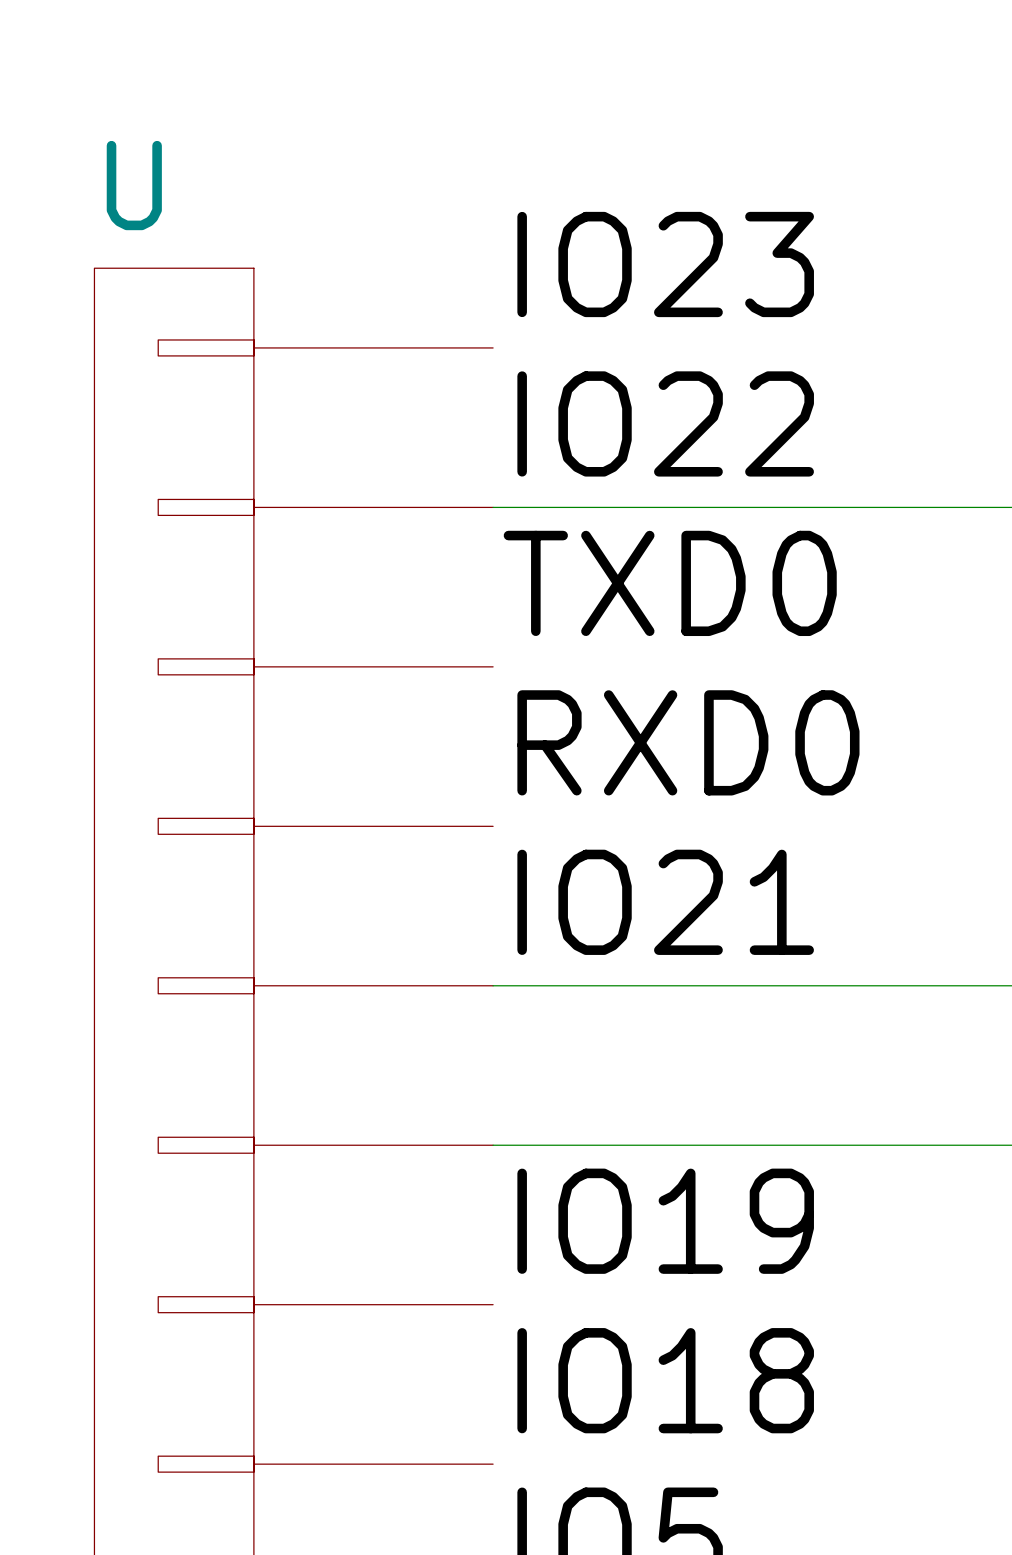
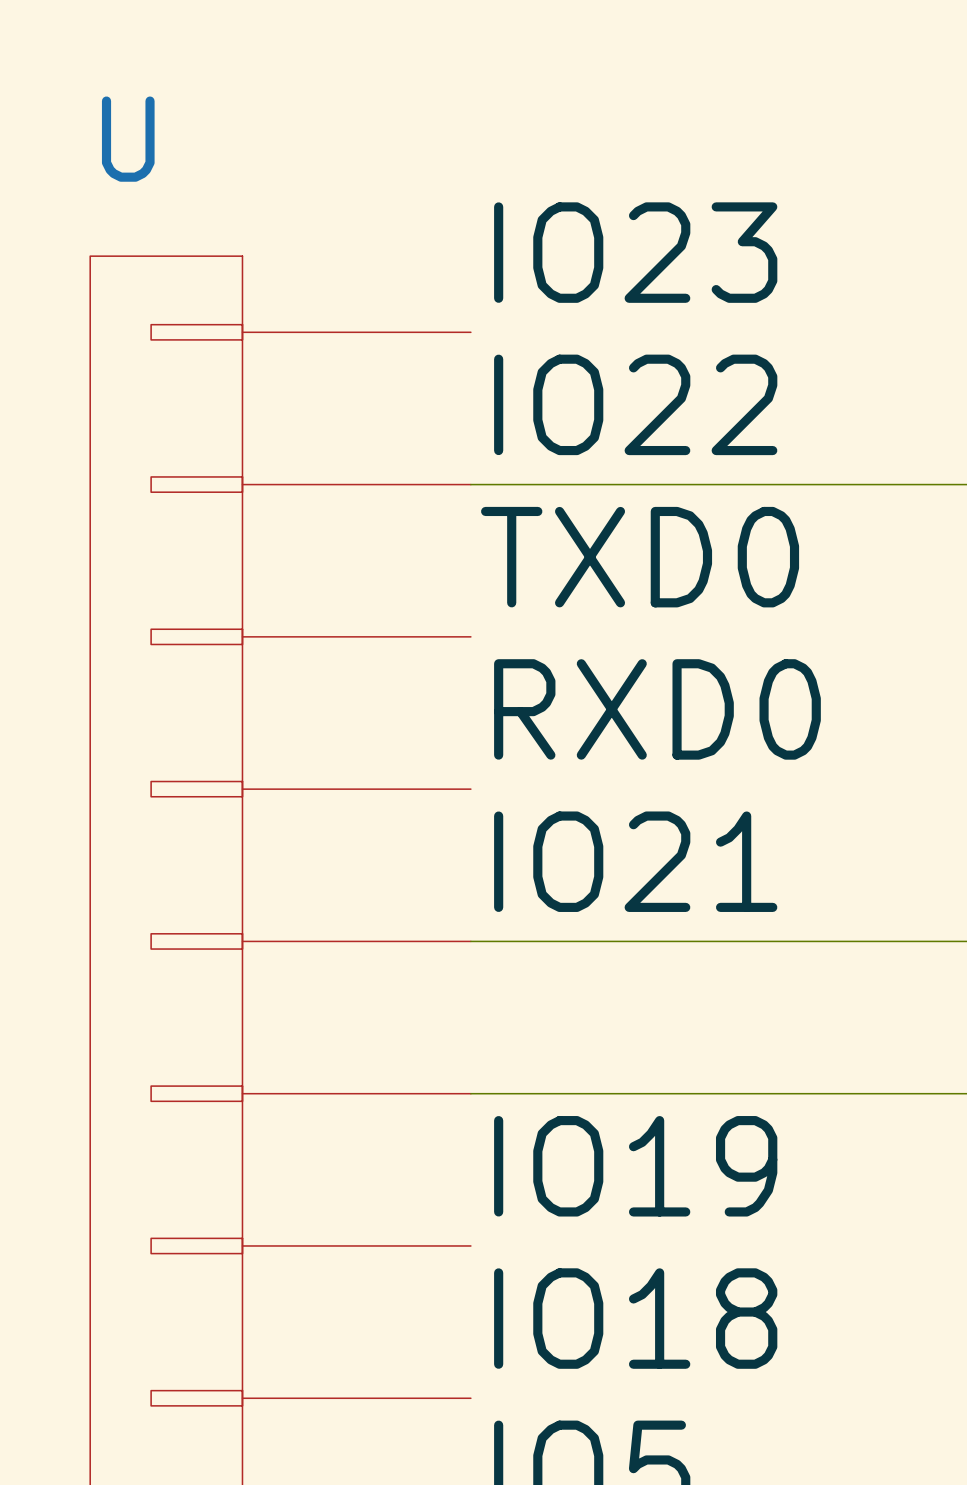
U name position: U (134, 185) -> U (128, 139)

